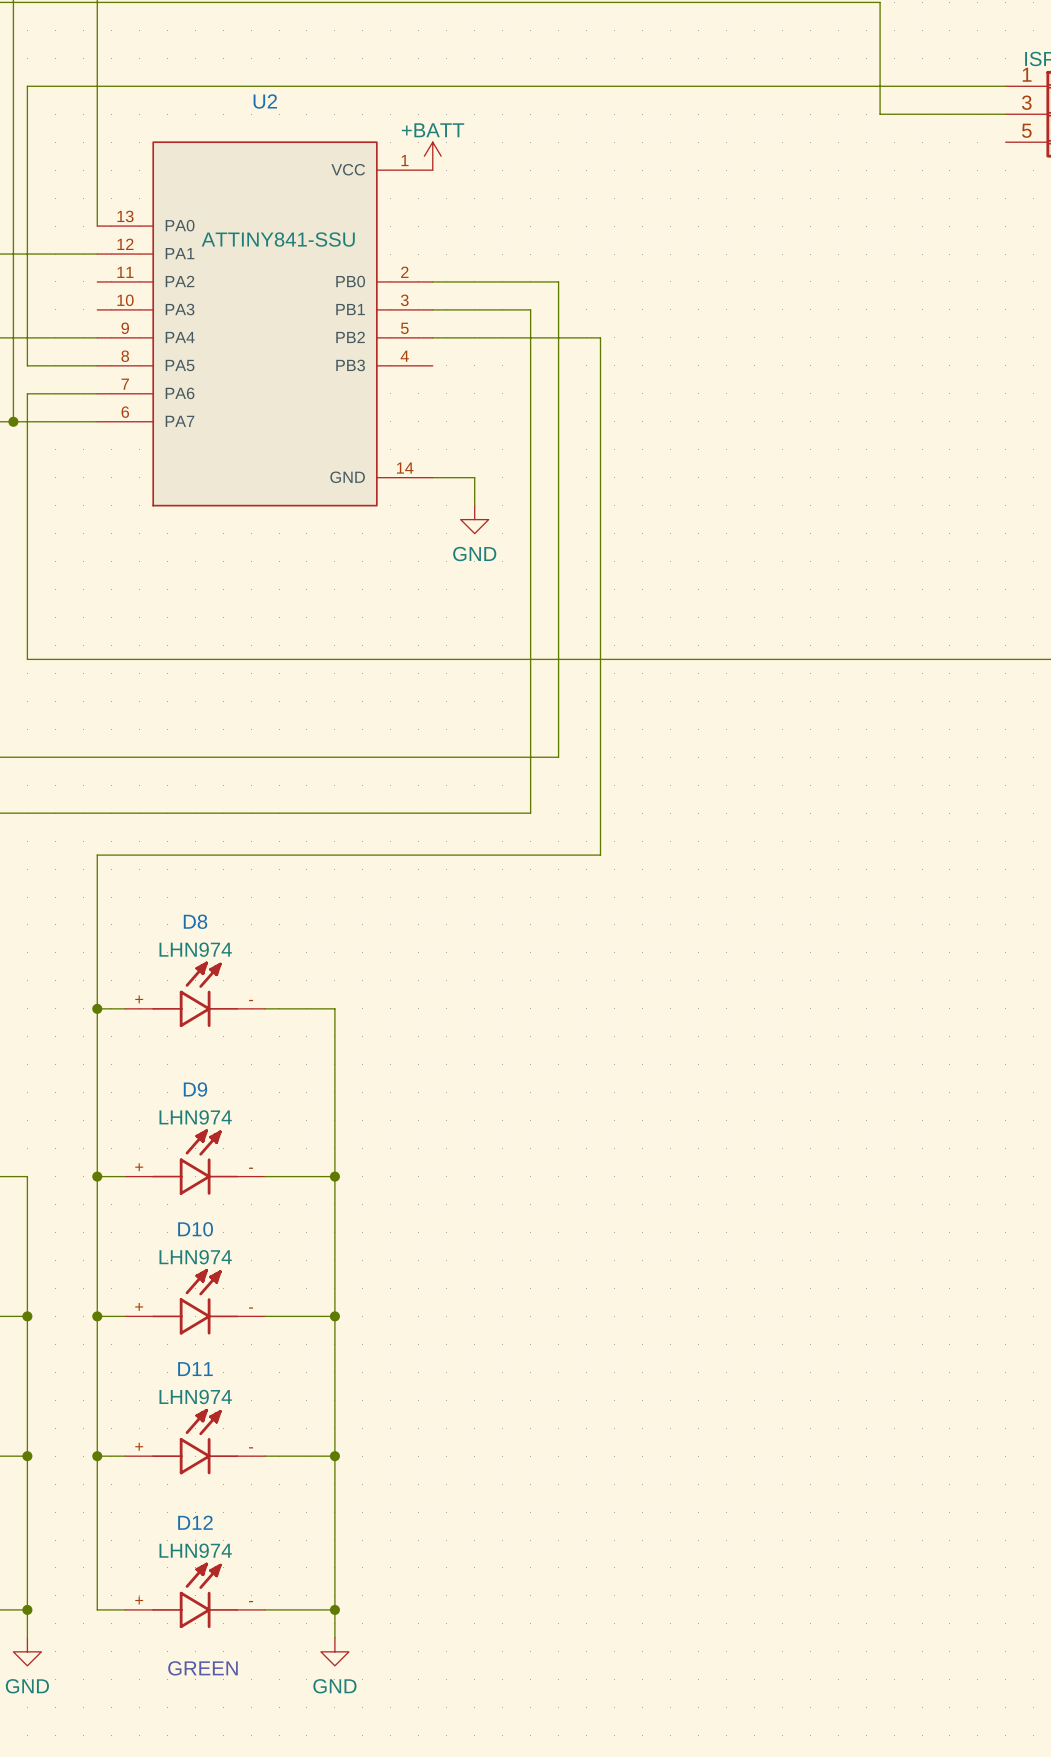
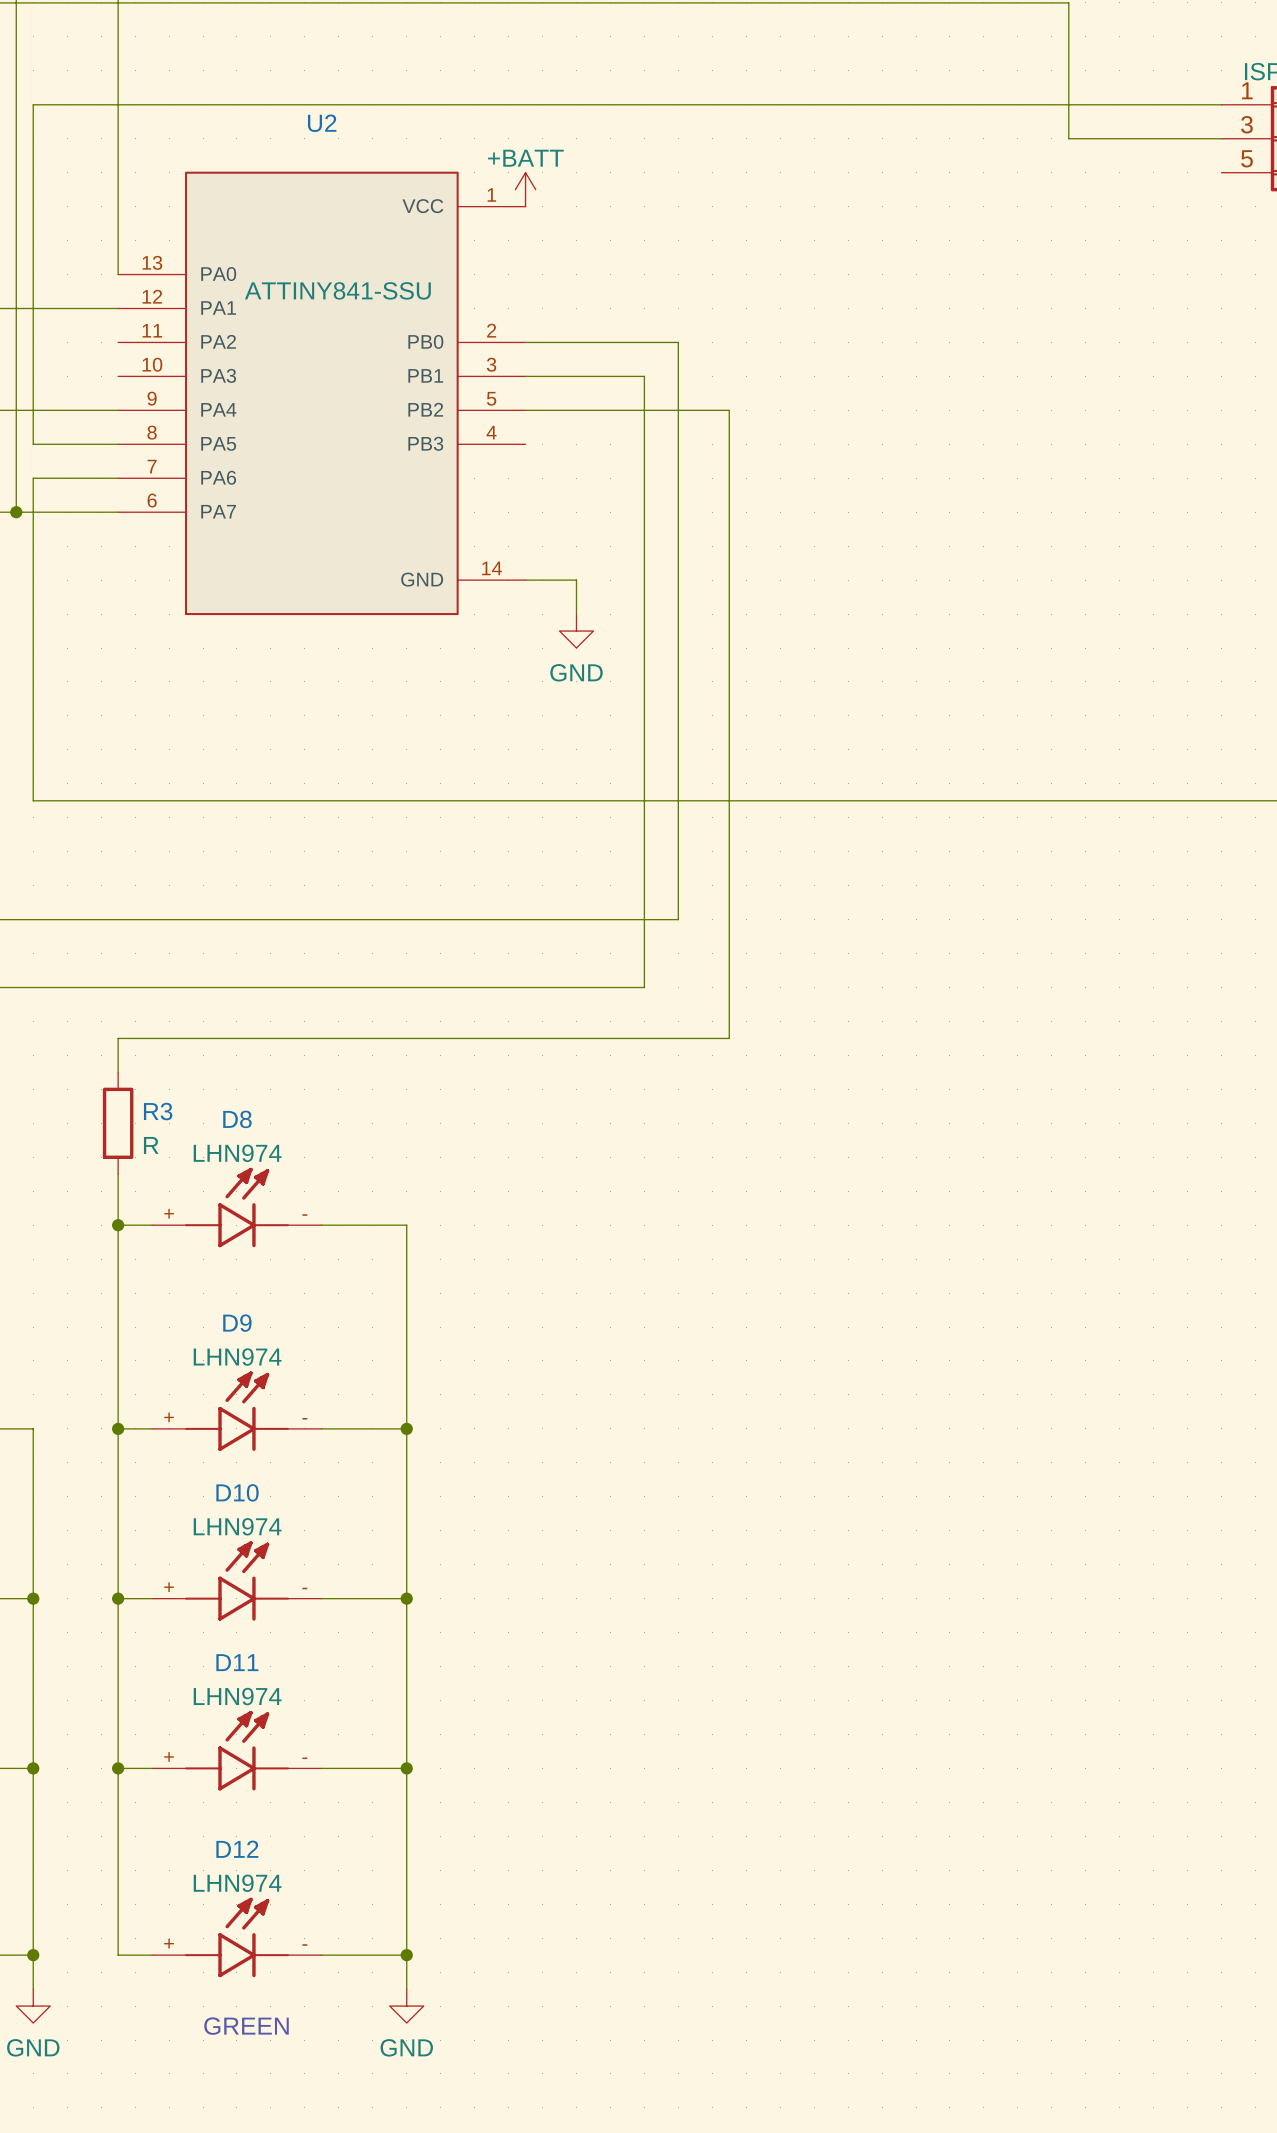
wire: (97, 883) (97, 966) -> none
R3: none -> R (118, 1123)

